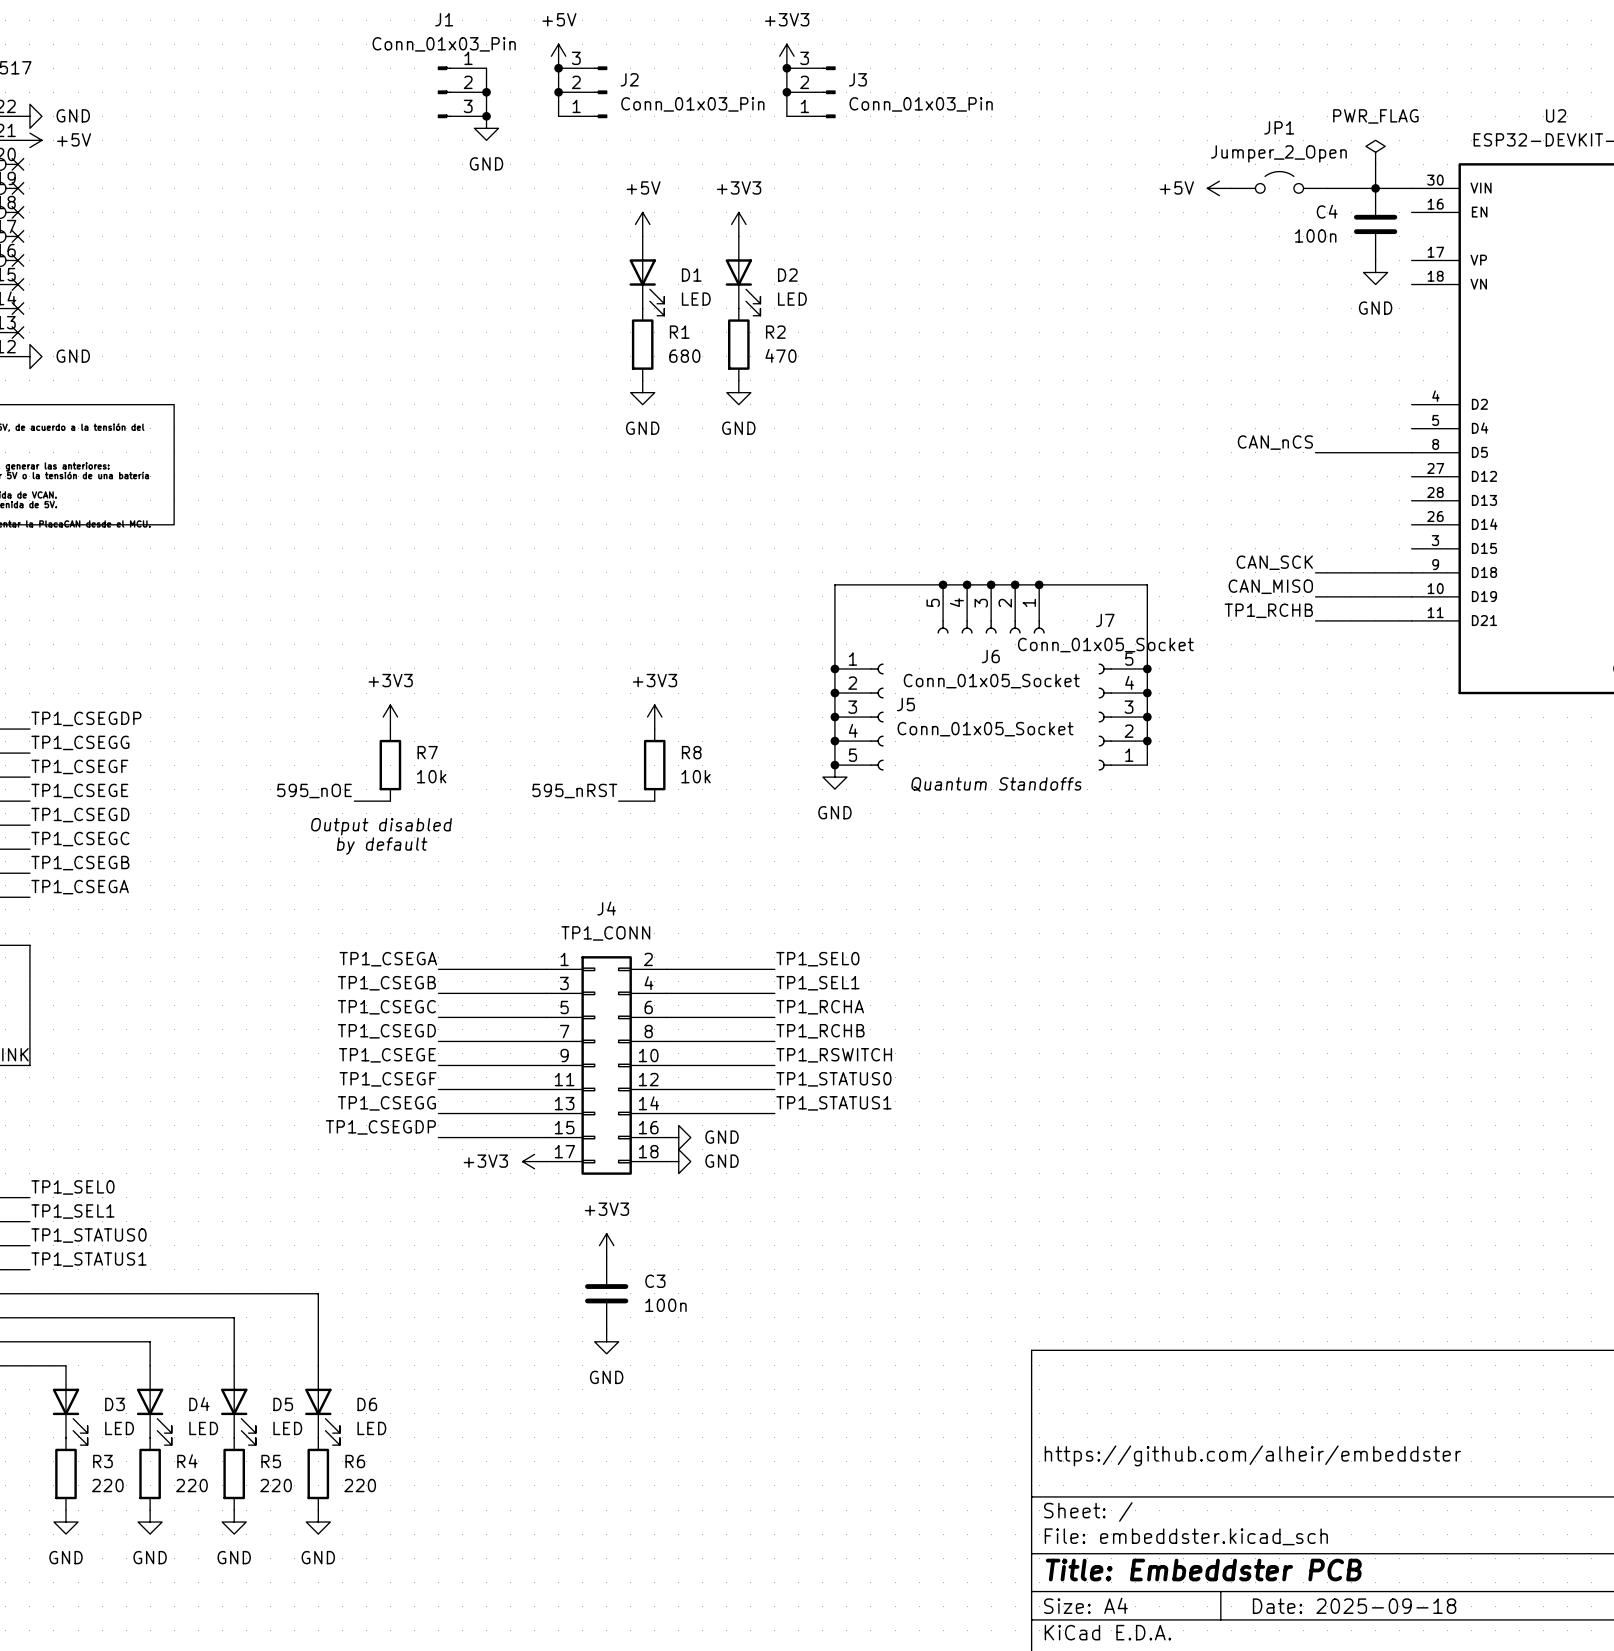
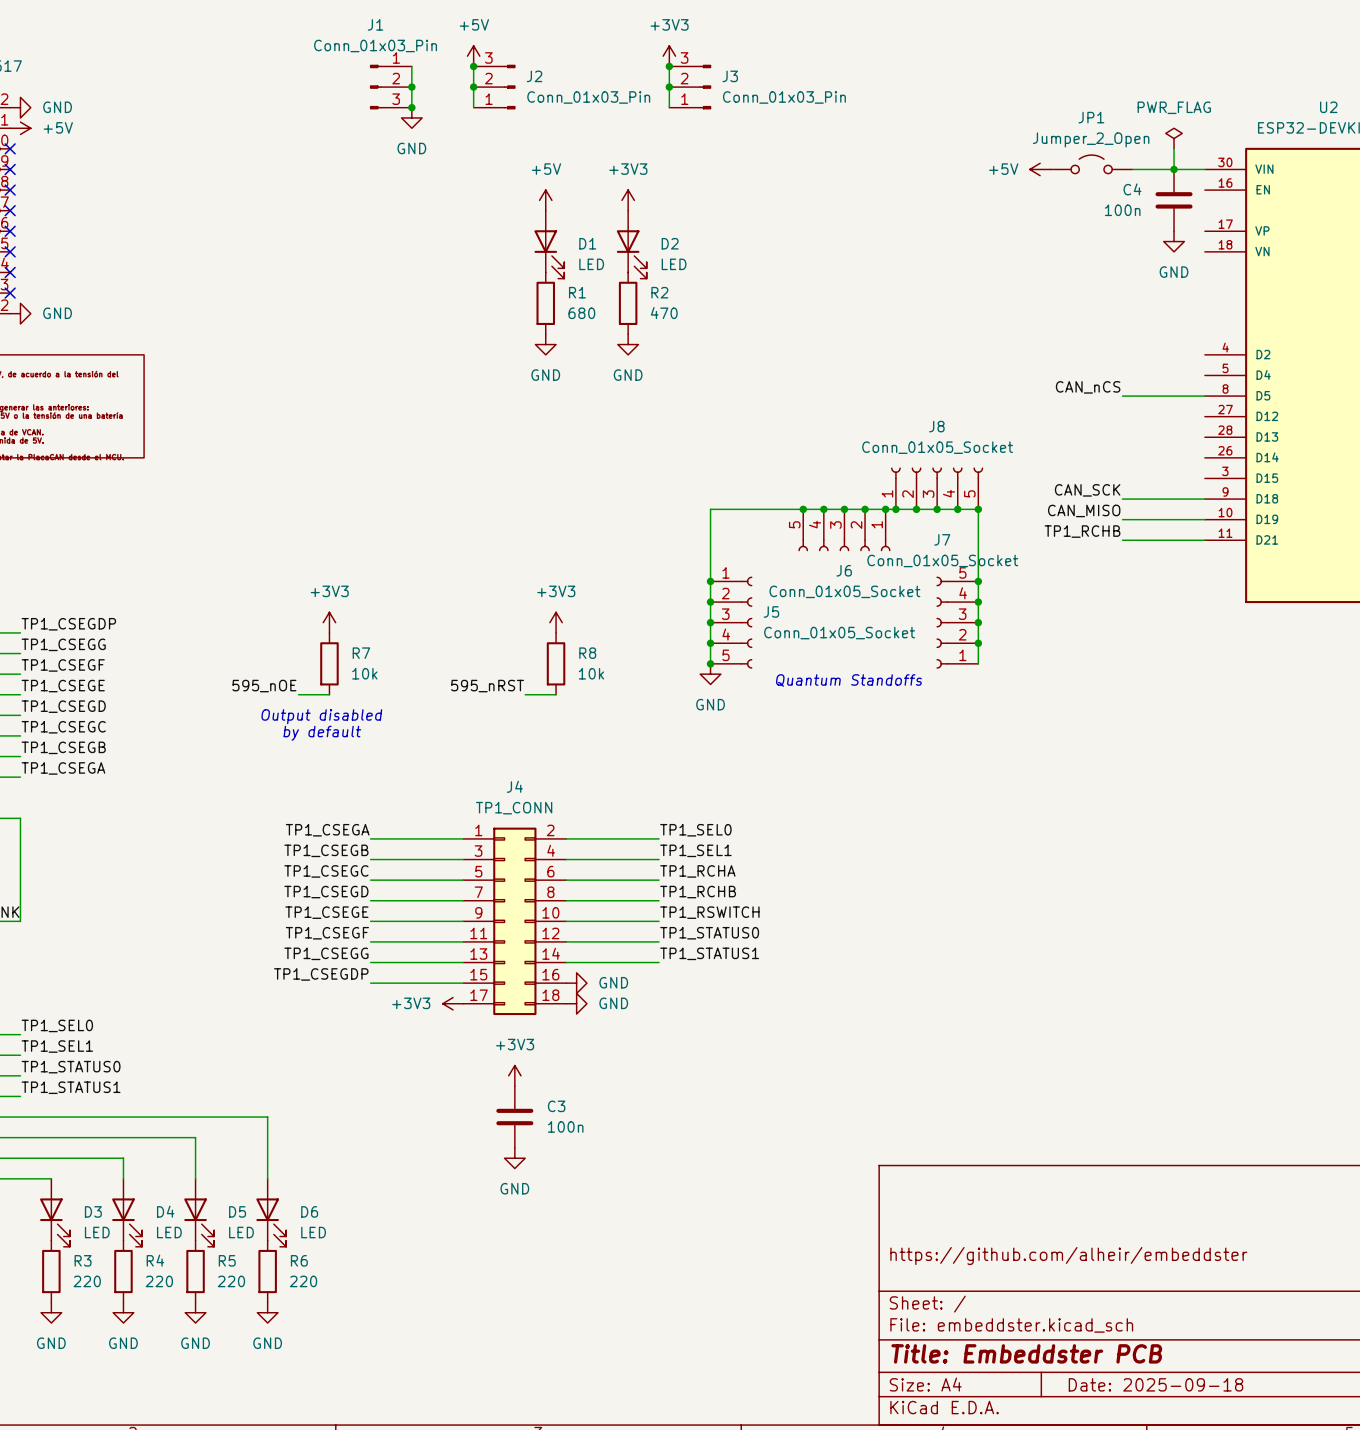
J8: none -> Conn_01x05_Socket (937, 488)
junction: none -> (895, 509)
junction: none -> (916, 509)
junction: none -> (937, 509)
junction: none -> (957, 509)
junction: none -> (978, 509)

